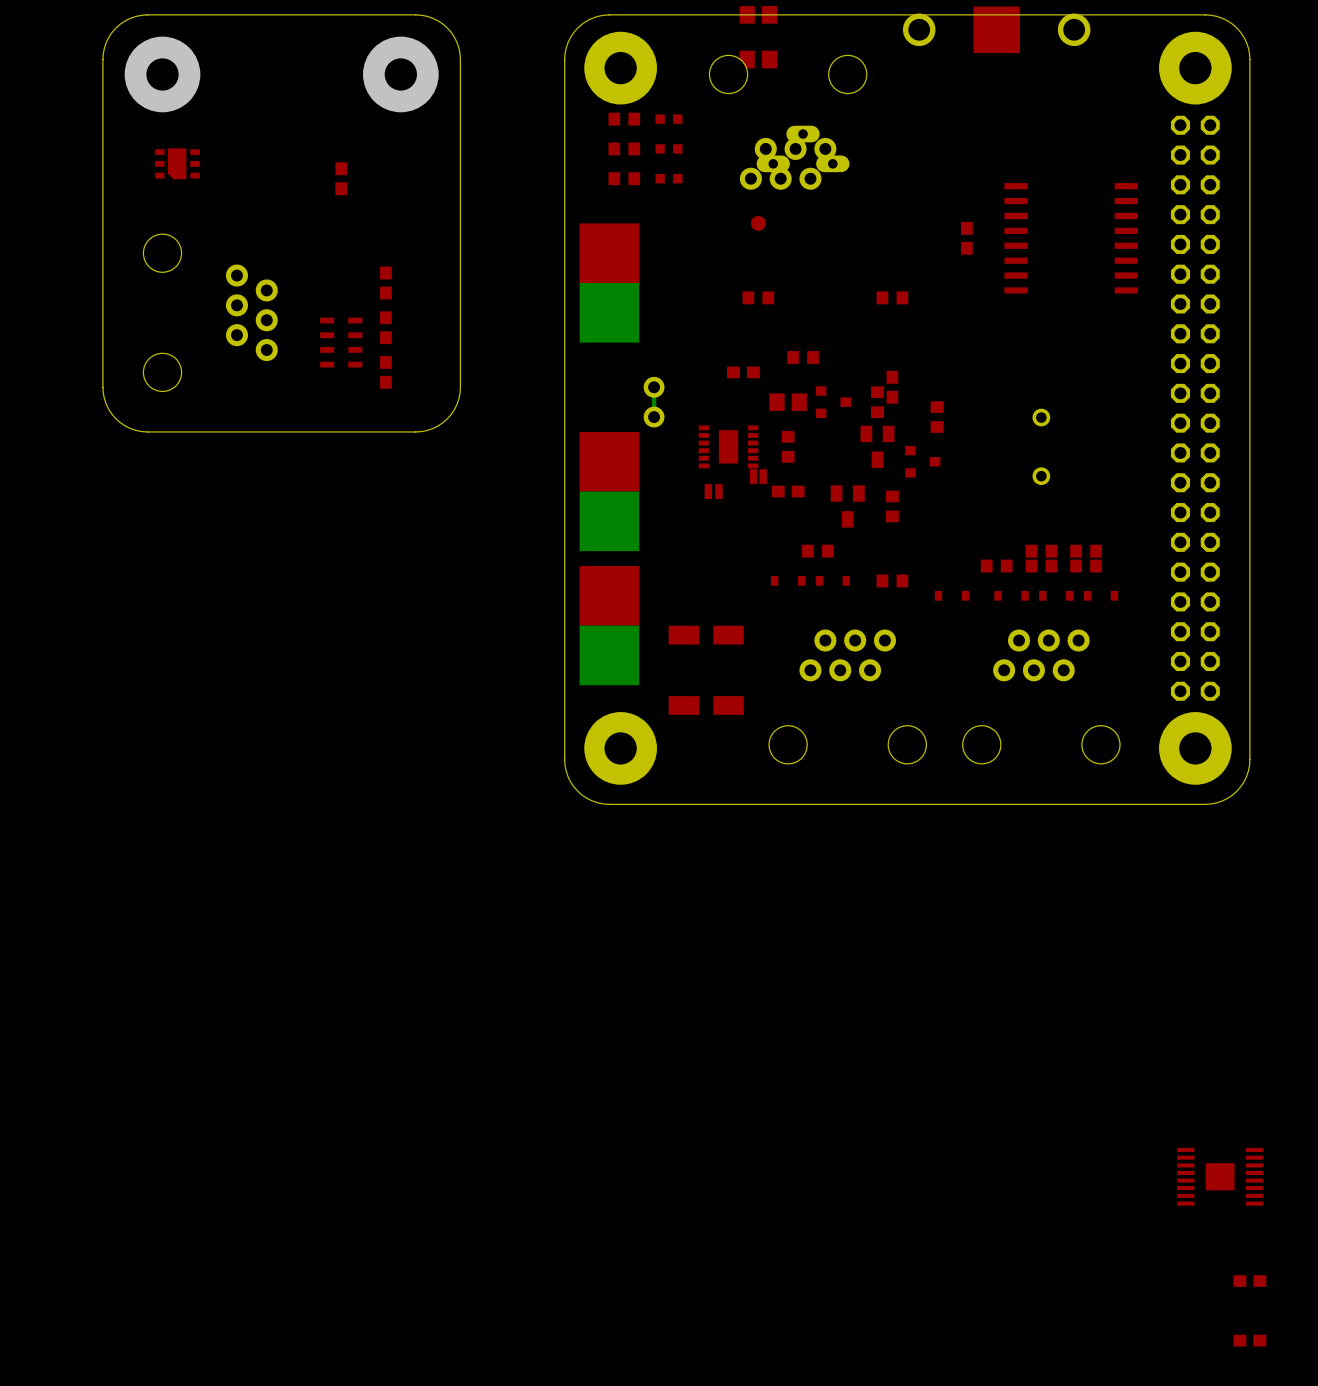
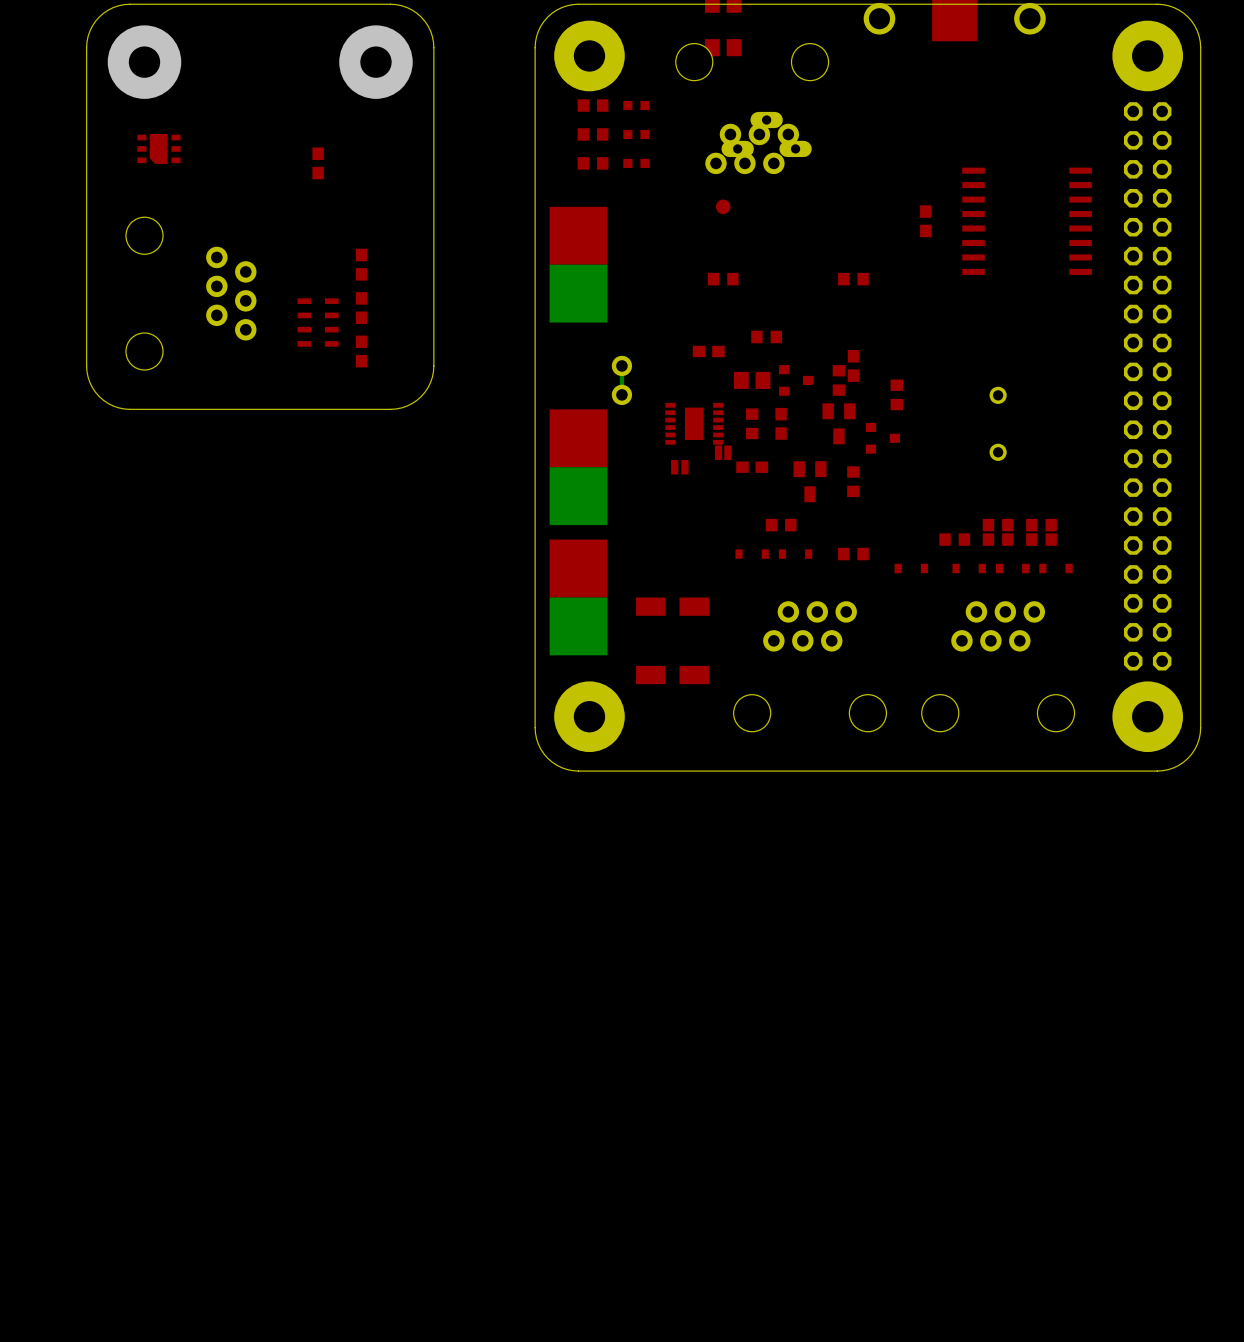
part: none -> (781, 423)
part: (1220, 1176) -> none
part: (1249, 1281) -> none
part: (1249, 1340) -> none

